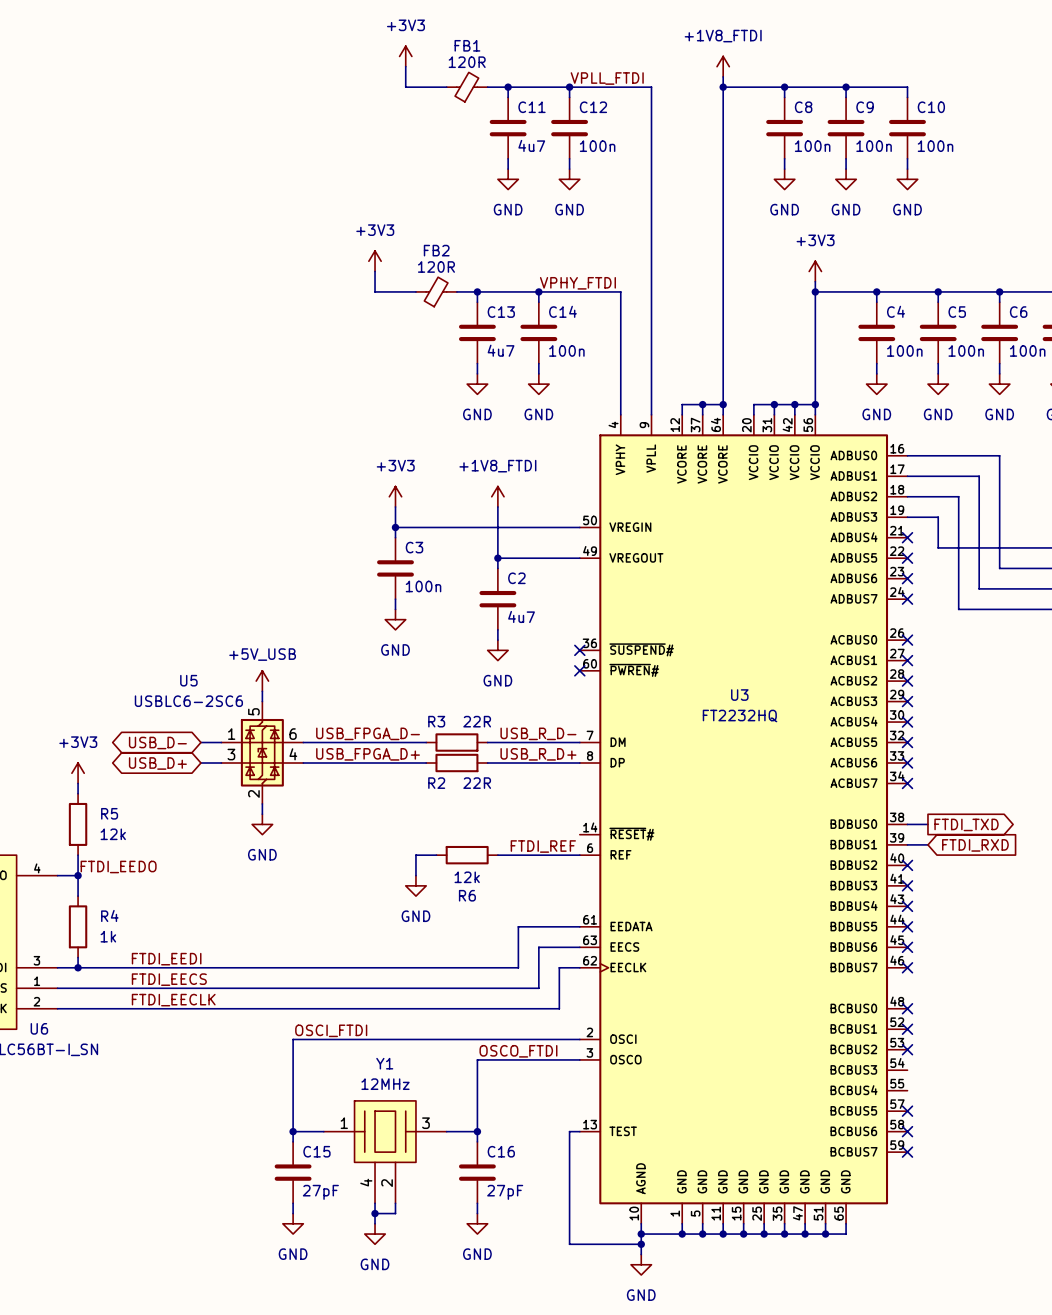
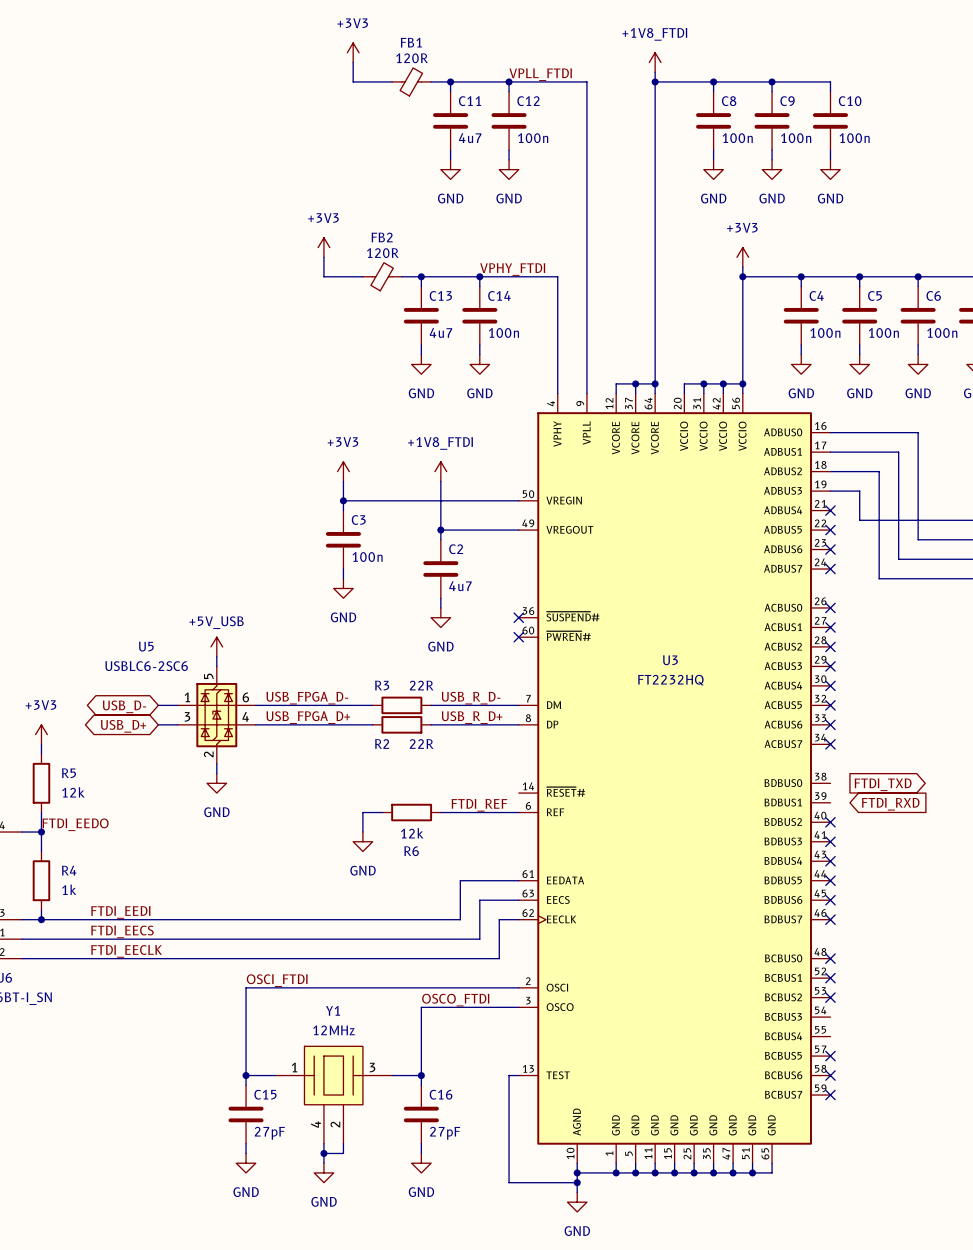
wire: (907, 824) (927, 824) -> none
wire: (907, 844) (927, 844) -> none

